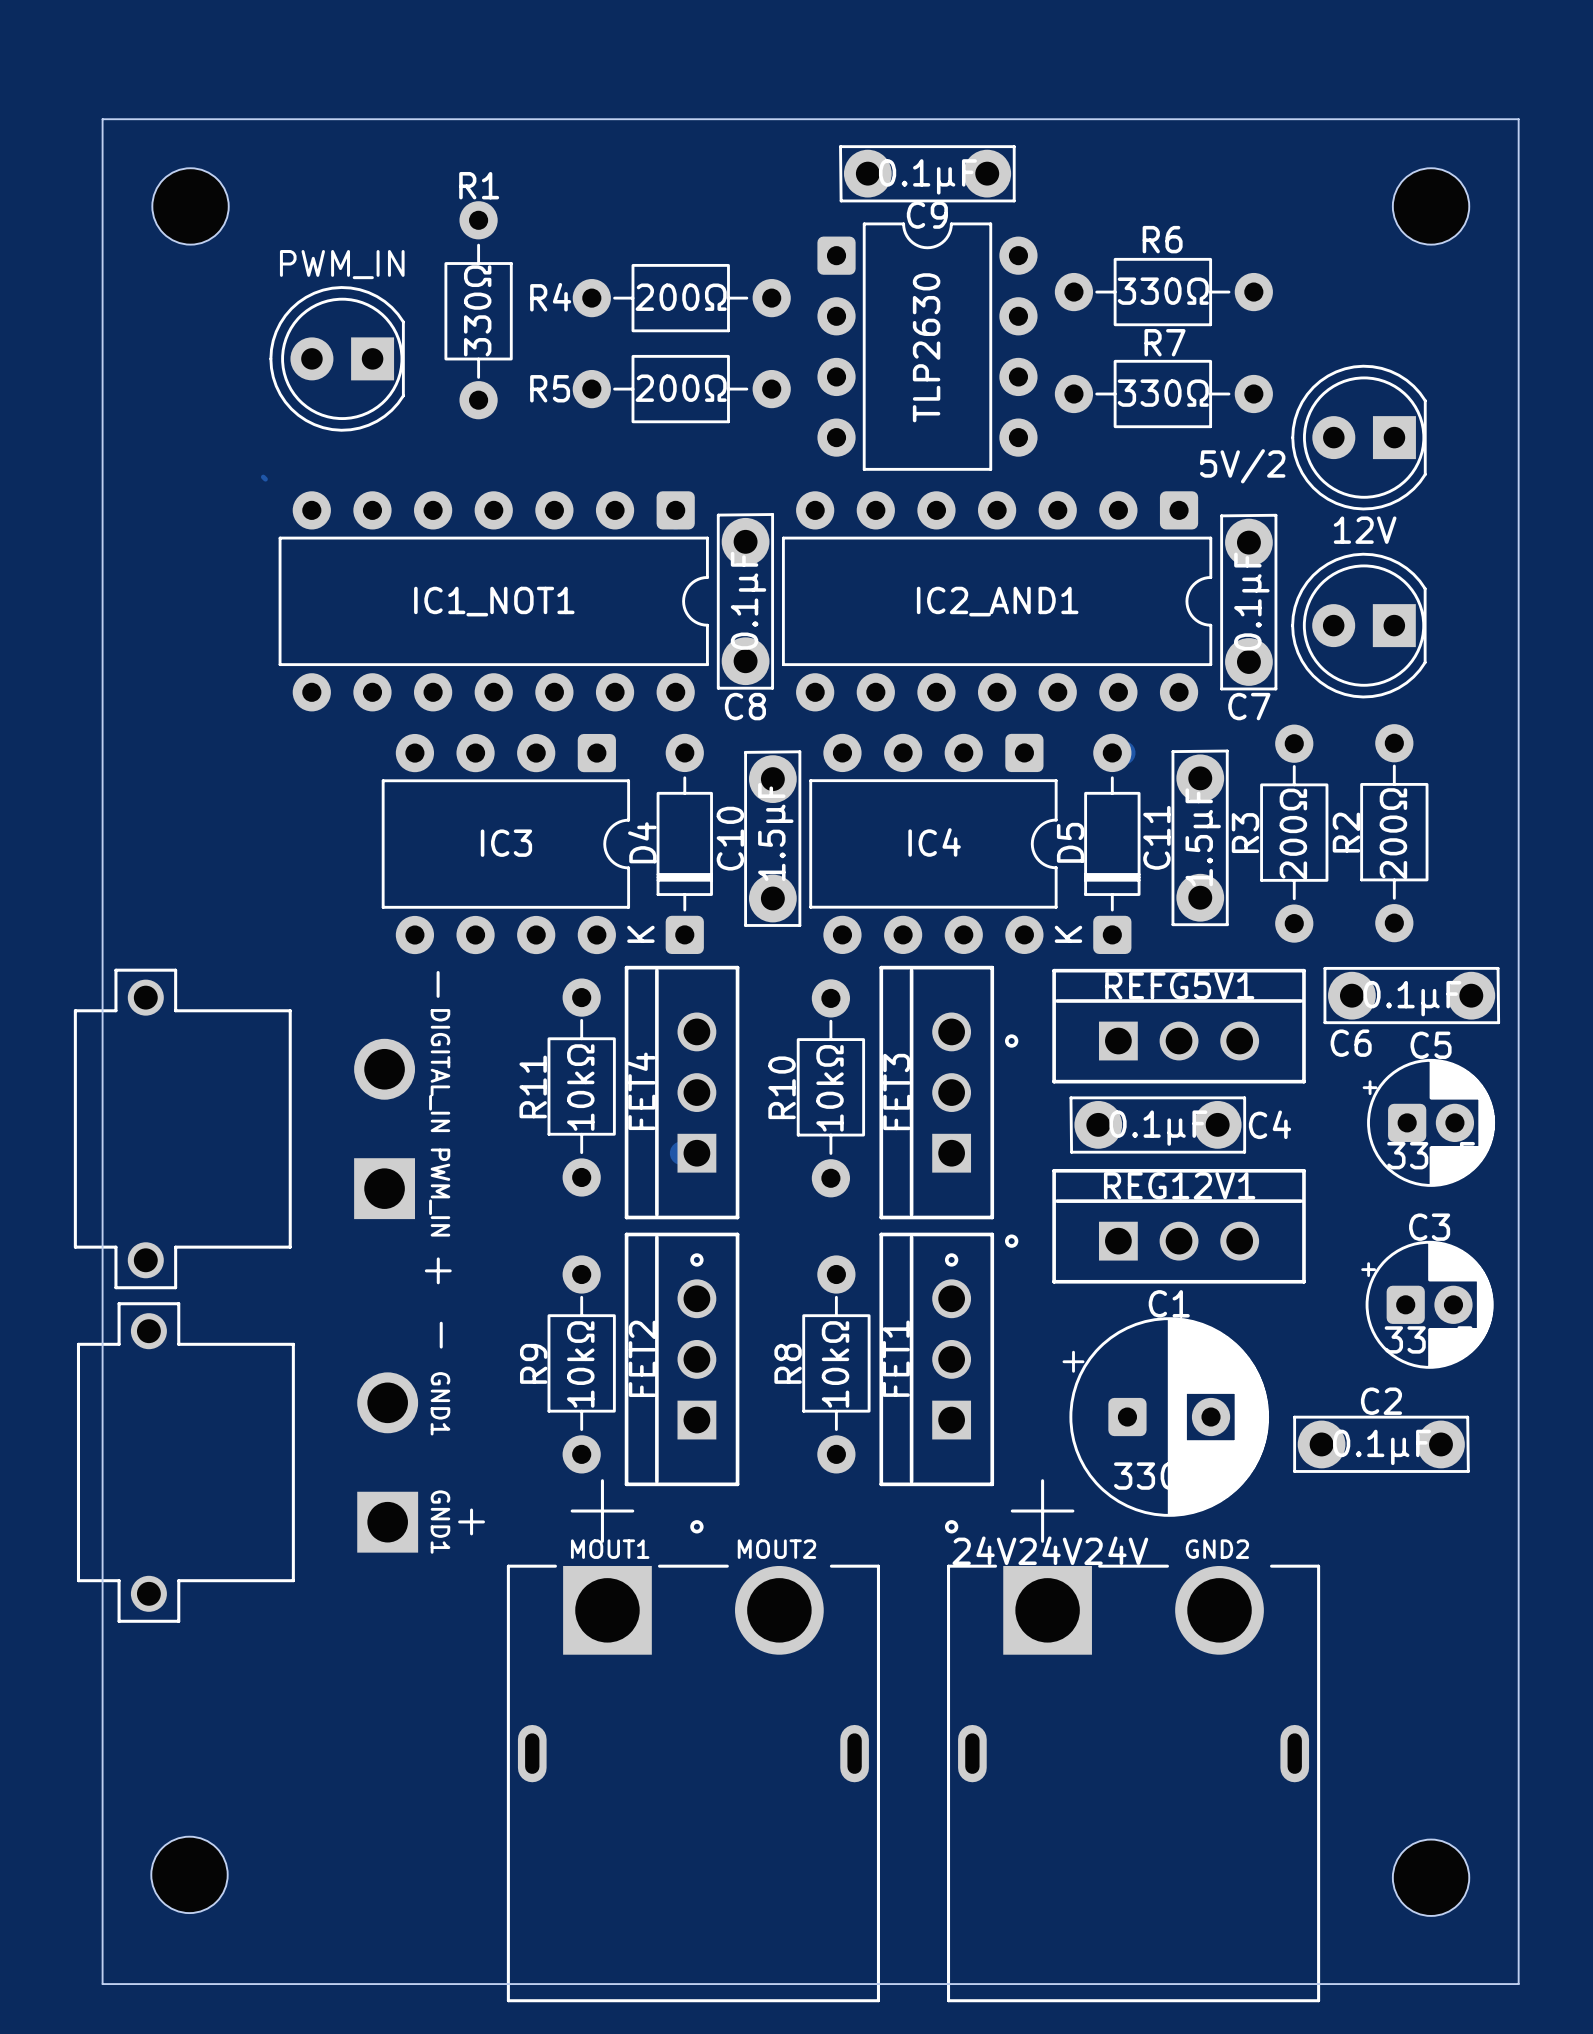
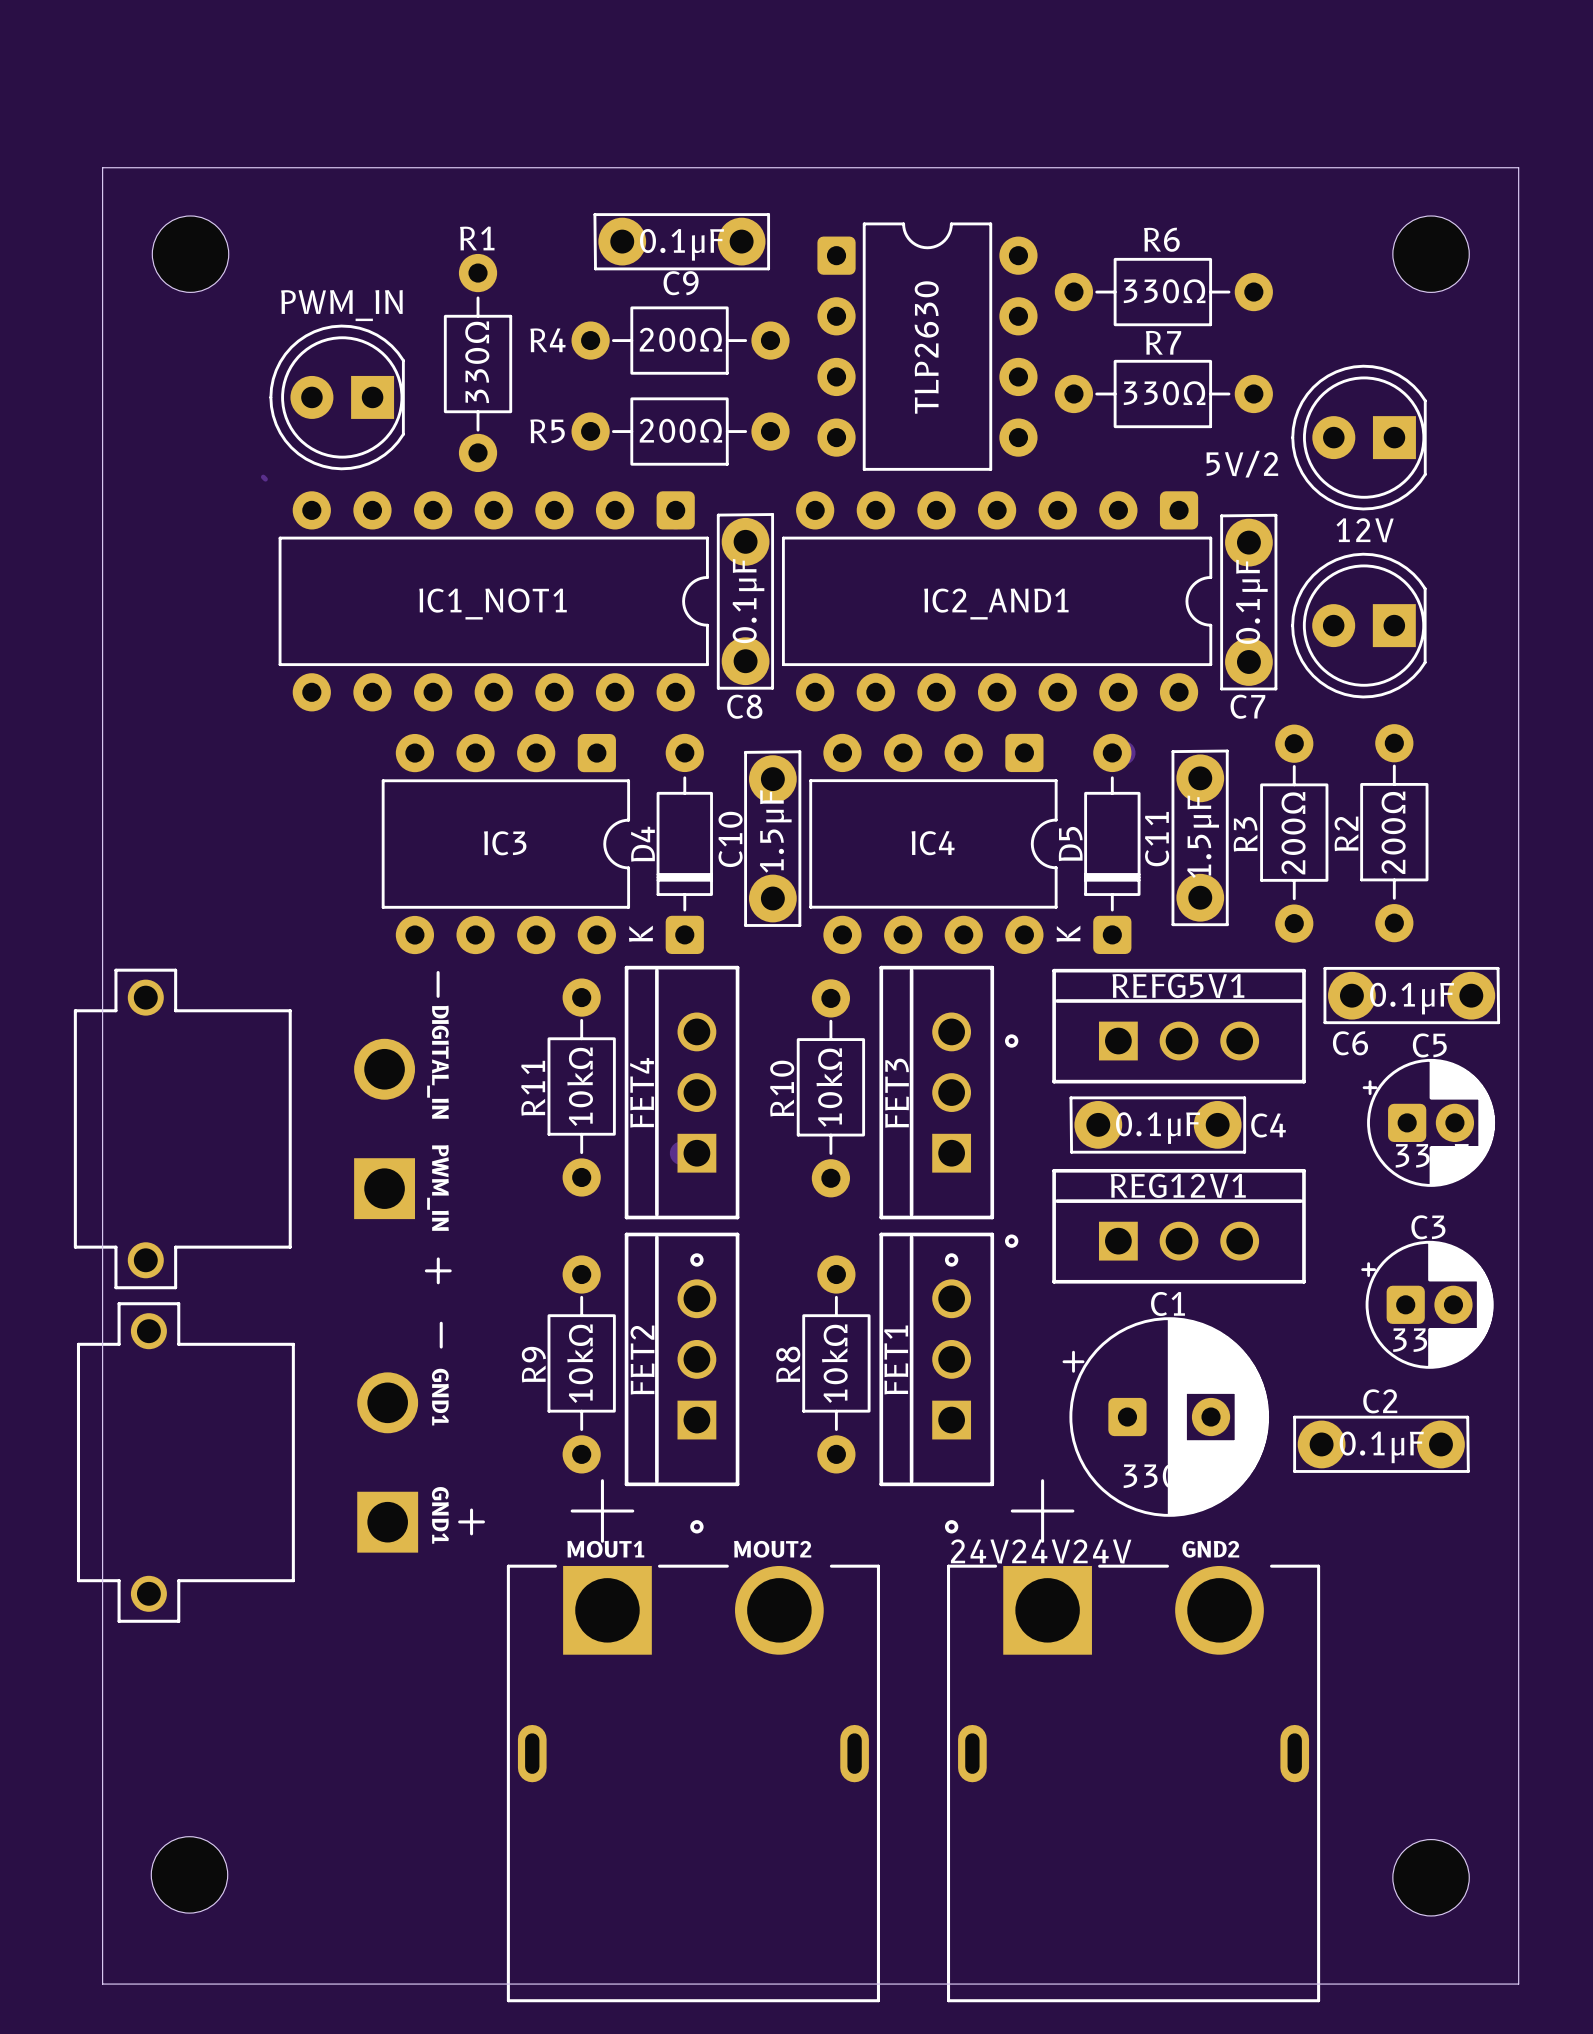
board edge: (102, 167) (102, 119) (1518, 119) (1518, 167) -> (102, 167) (1518, 167)
C9 position: (927, 173) -> (681, 241)
part position: (190, 206) -> (190, 254)
part position: (1431, 206) -> (1431, 254)
R4 position: (681, 298) -> (680, 340)
R1 position: (478, 310) -> (478, 362)
part position: (337, 358) -> (337, 397)
R5 position: (681, 389) -> (680, 431)

